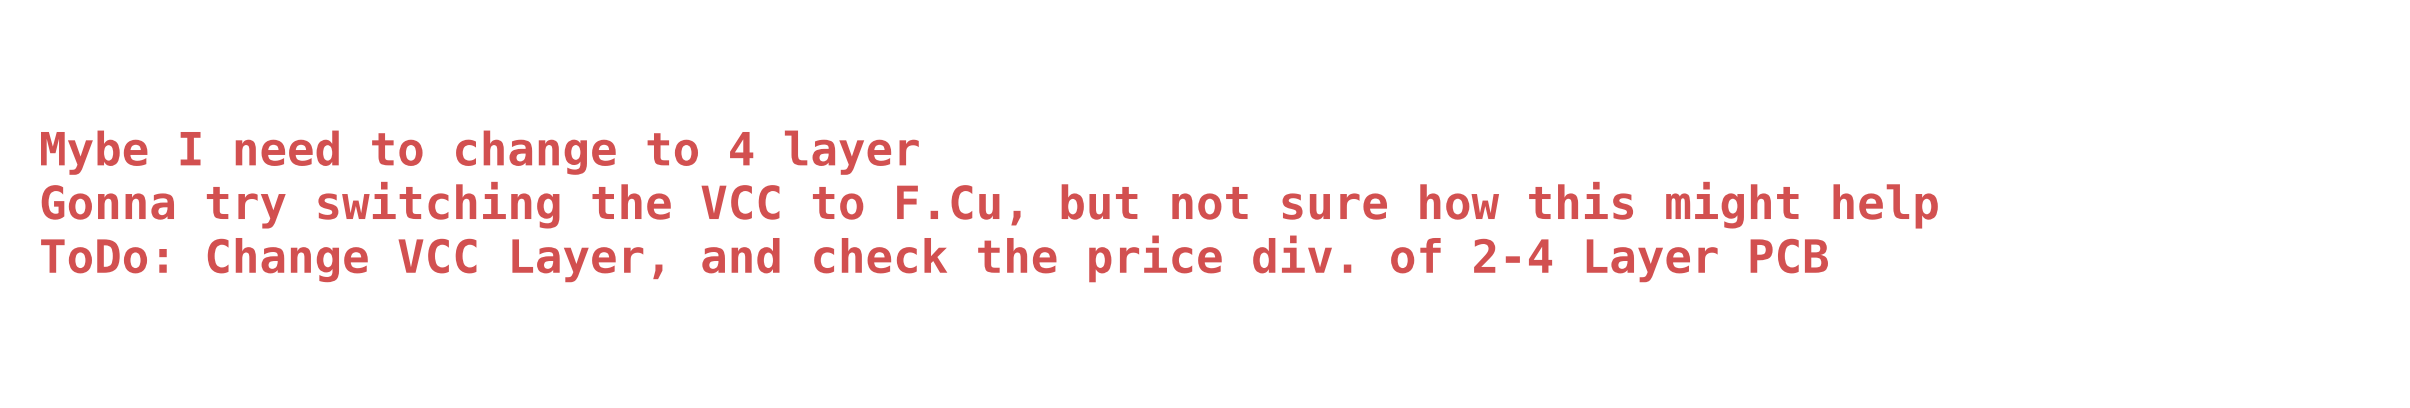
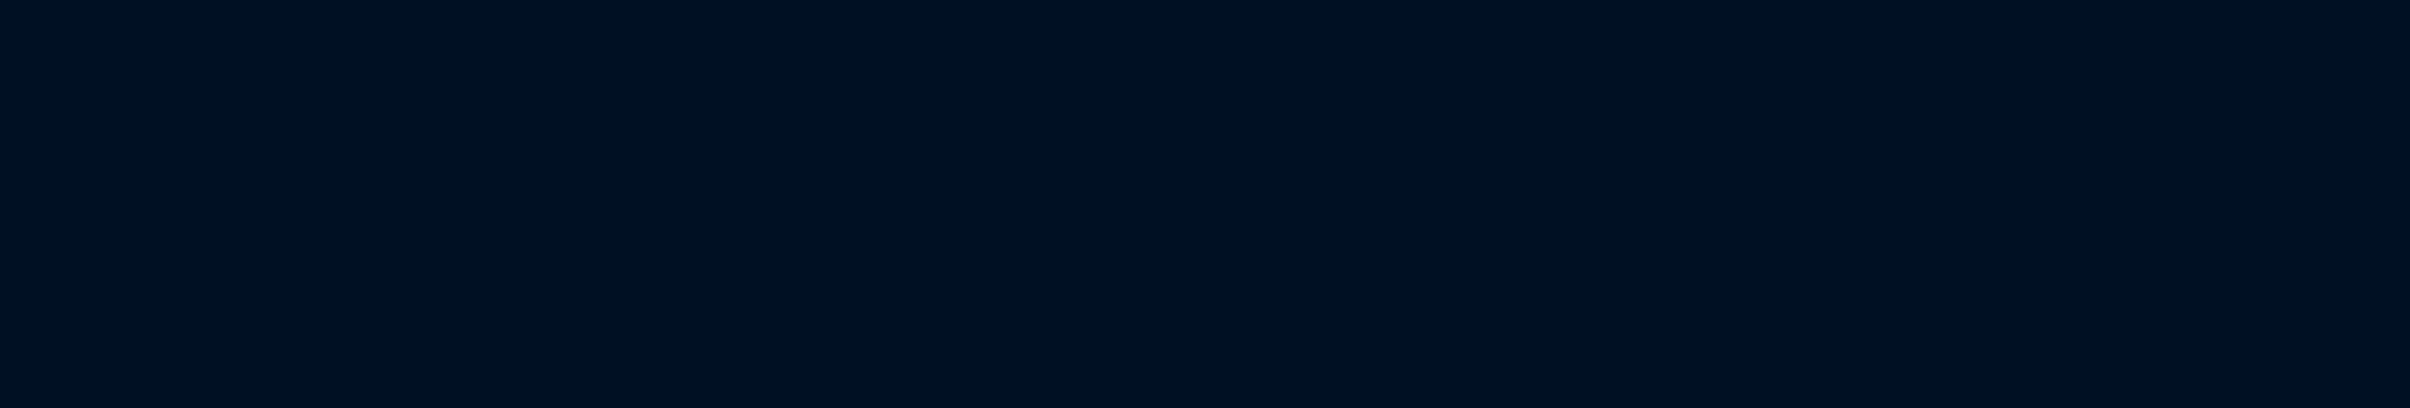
text: Mybe I need to change to 4 layer (479, 152) -> none
text: Gonna try switching the VCC to F.Cu, but not sure how this might help (989, 205) -> none
text: ToDo: Change VCC Layer, and check the price div. of 2-4 Layer PCB (934, 258) -> none

